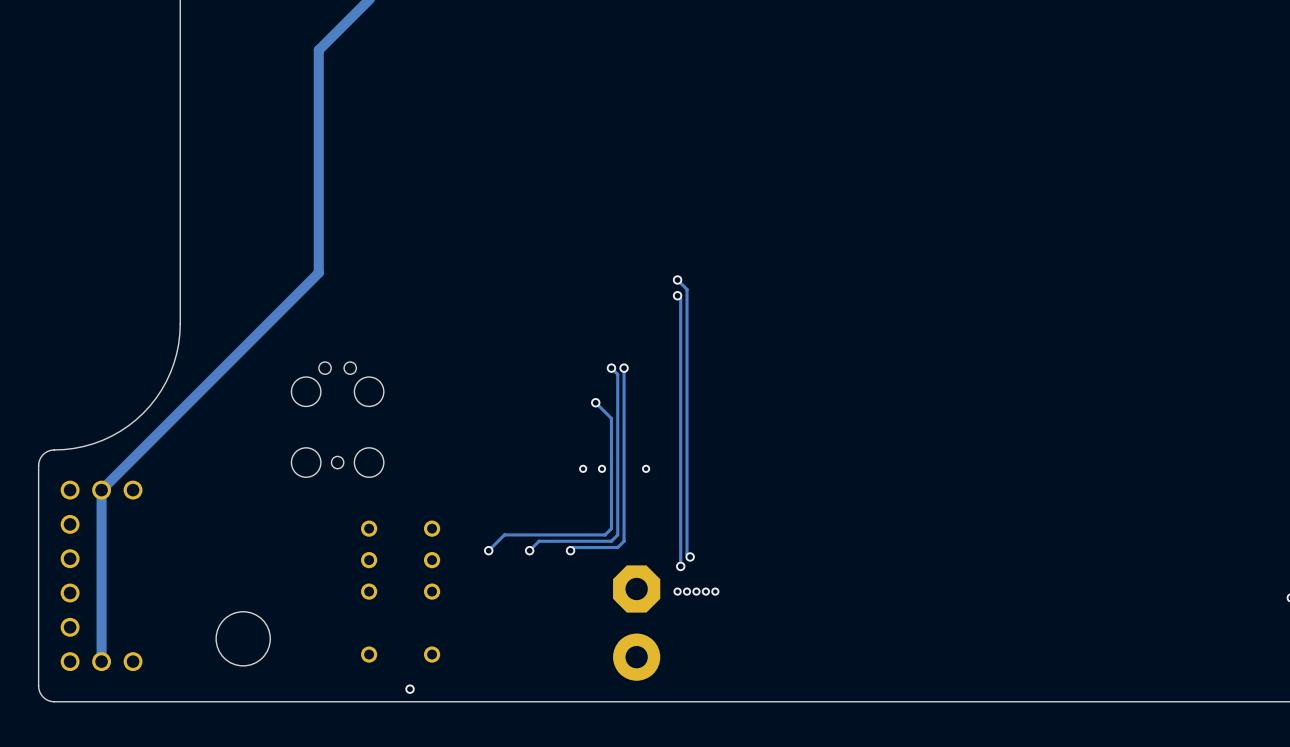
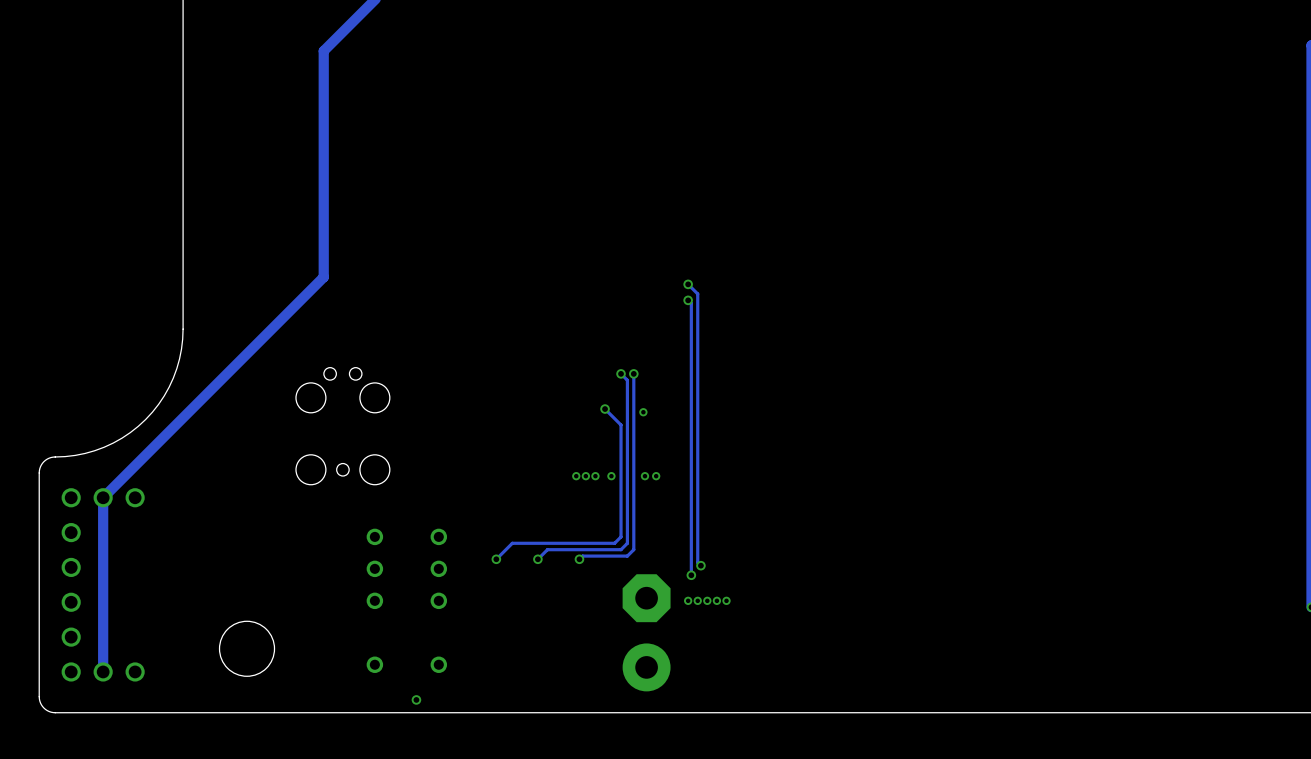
via: none -> (643, 412)
via: none -> (576, 476)
via: none -> (585, 476)
via: (583, 468) -> none
via: none -> (595, 476)
via: none -> (644, 476)

